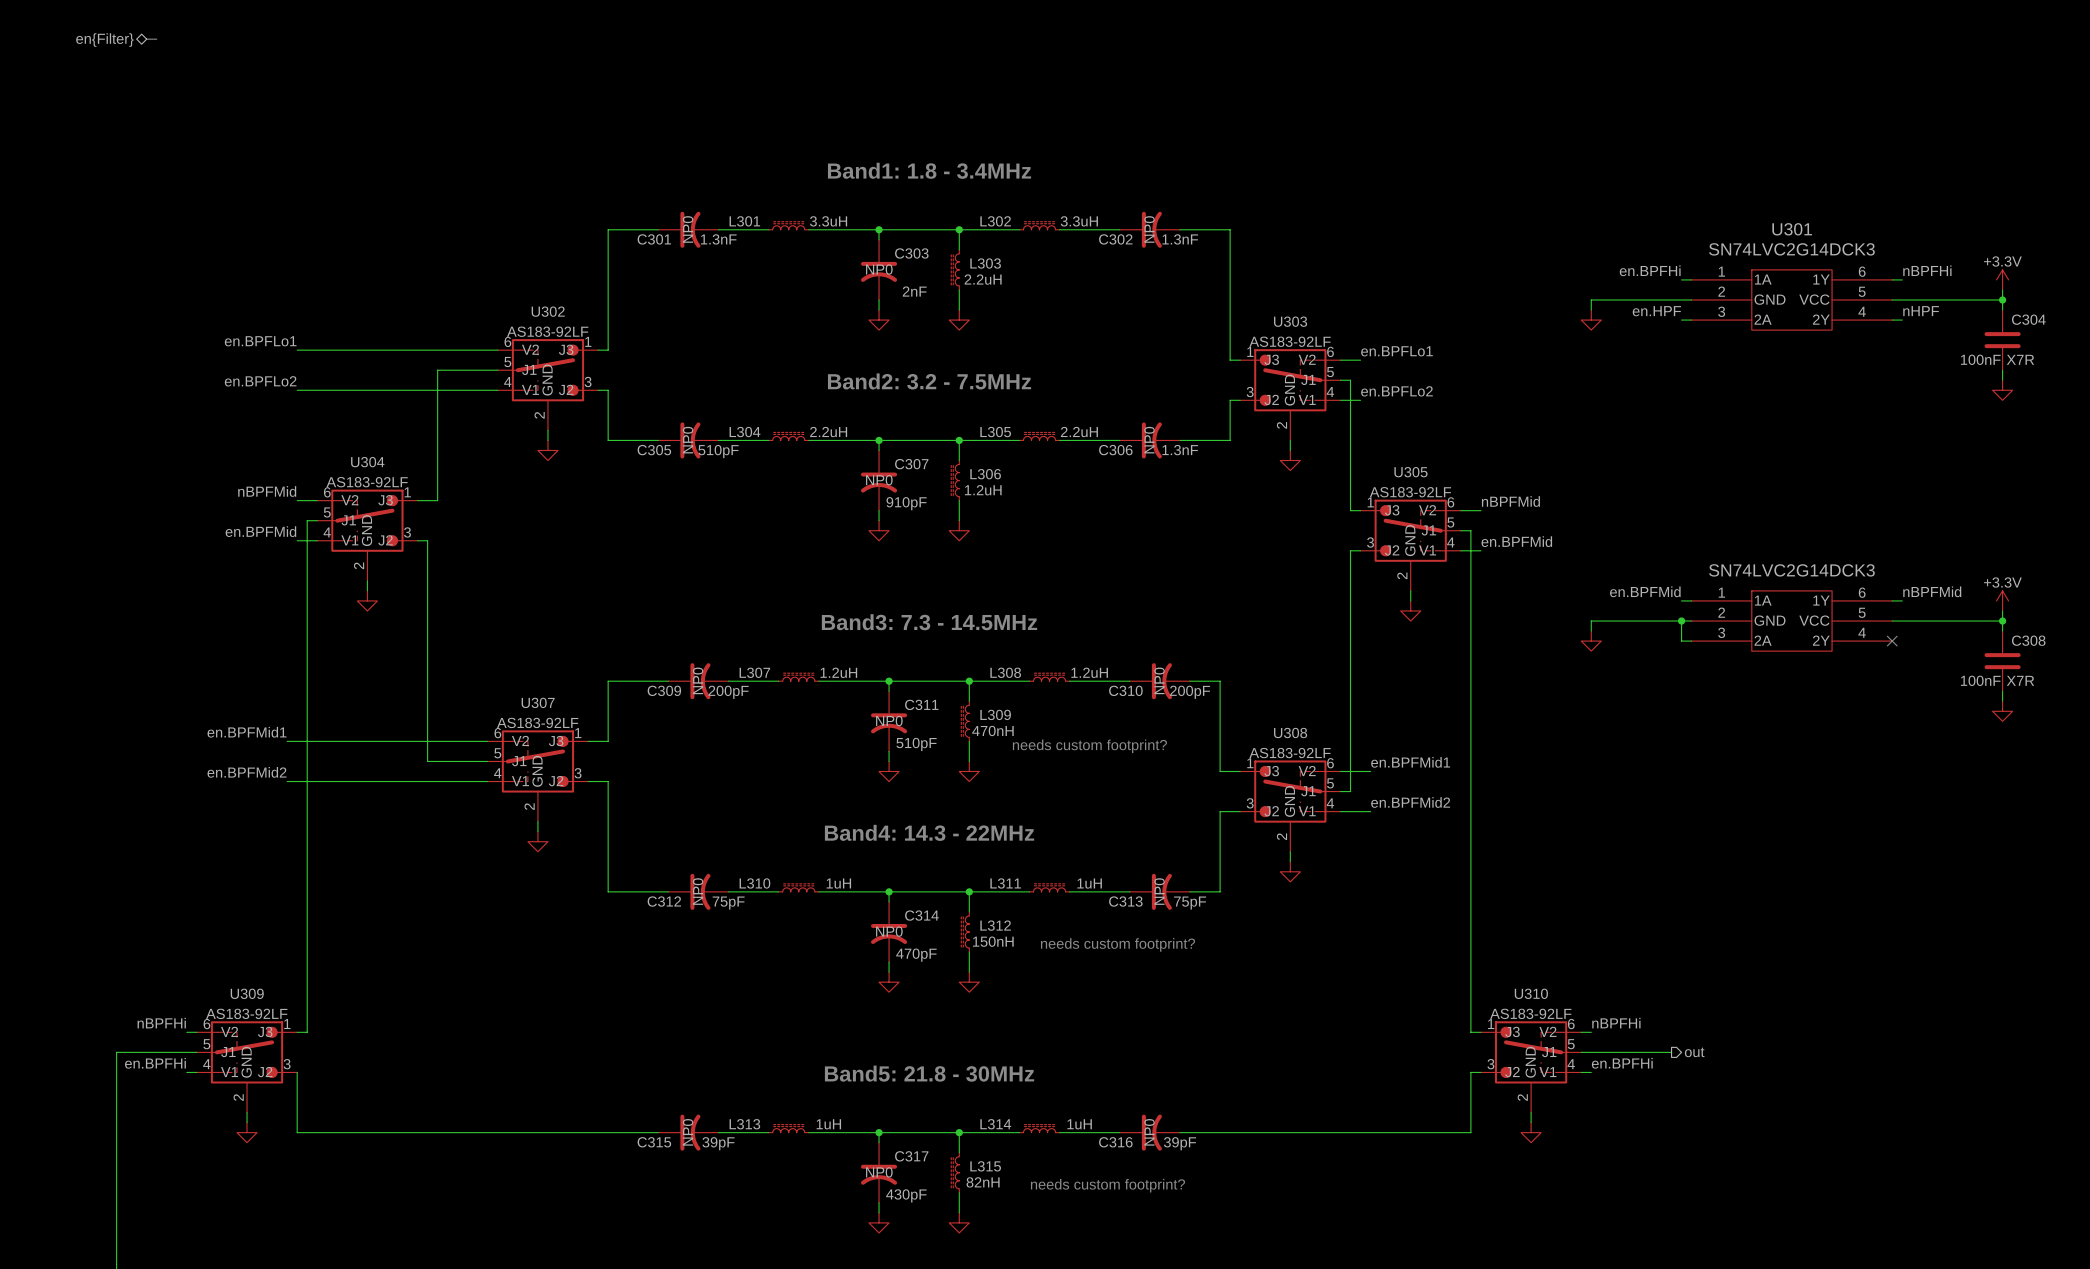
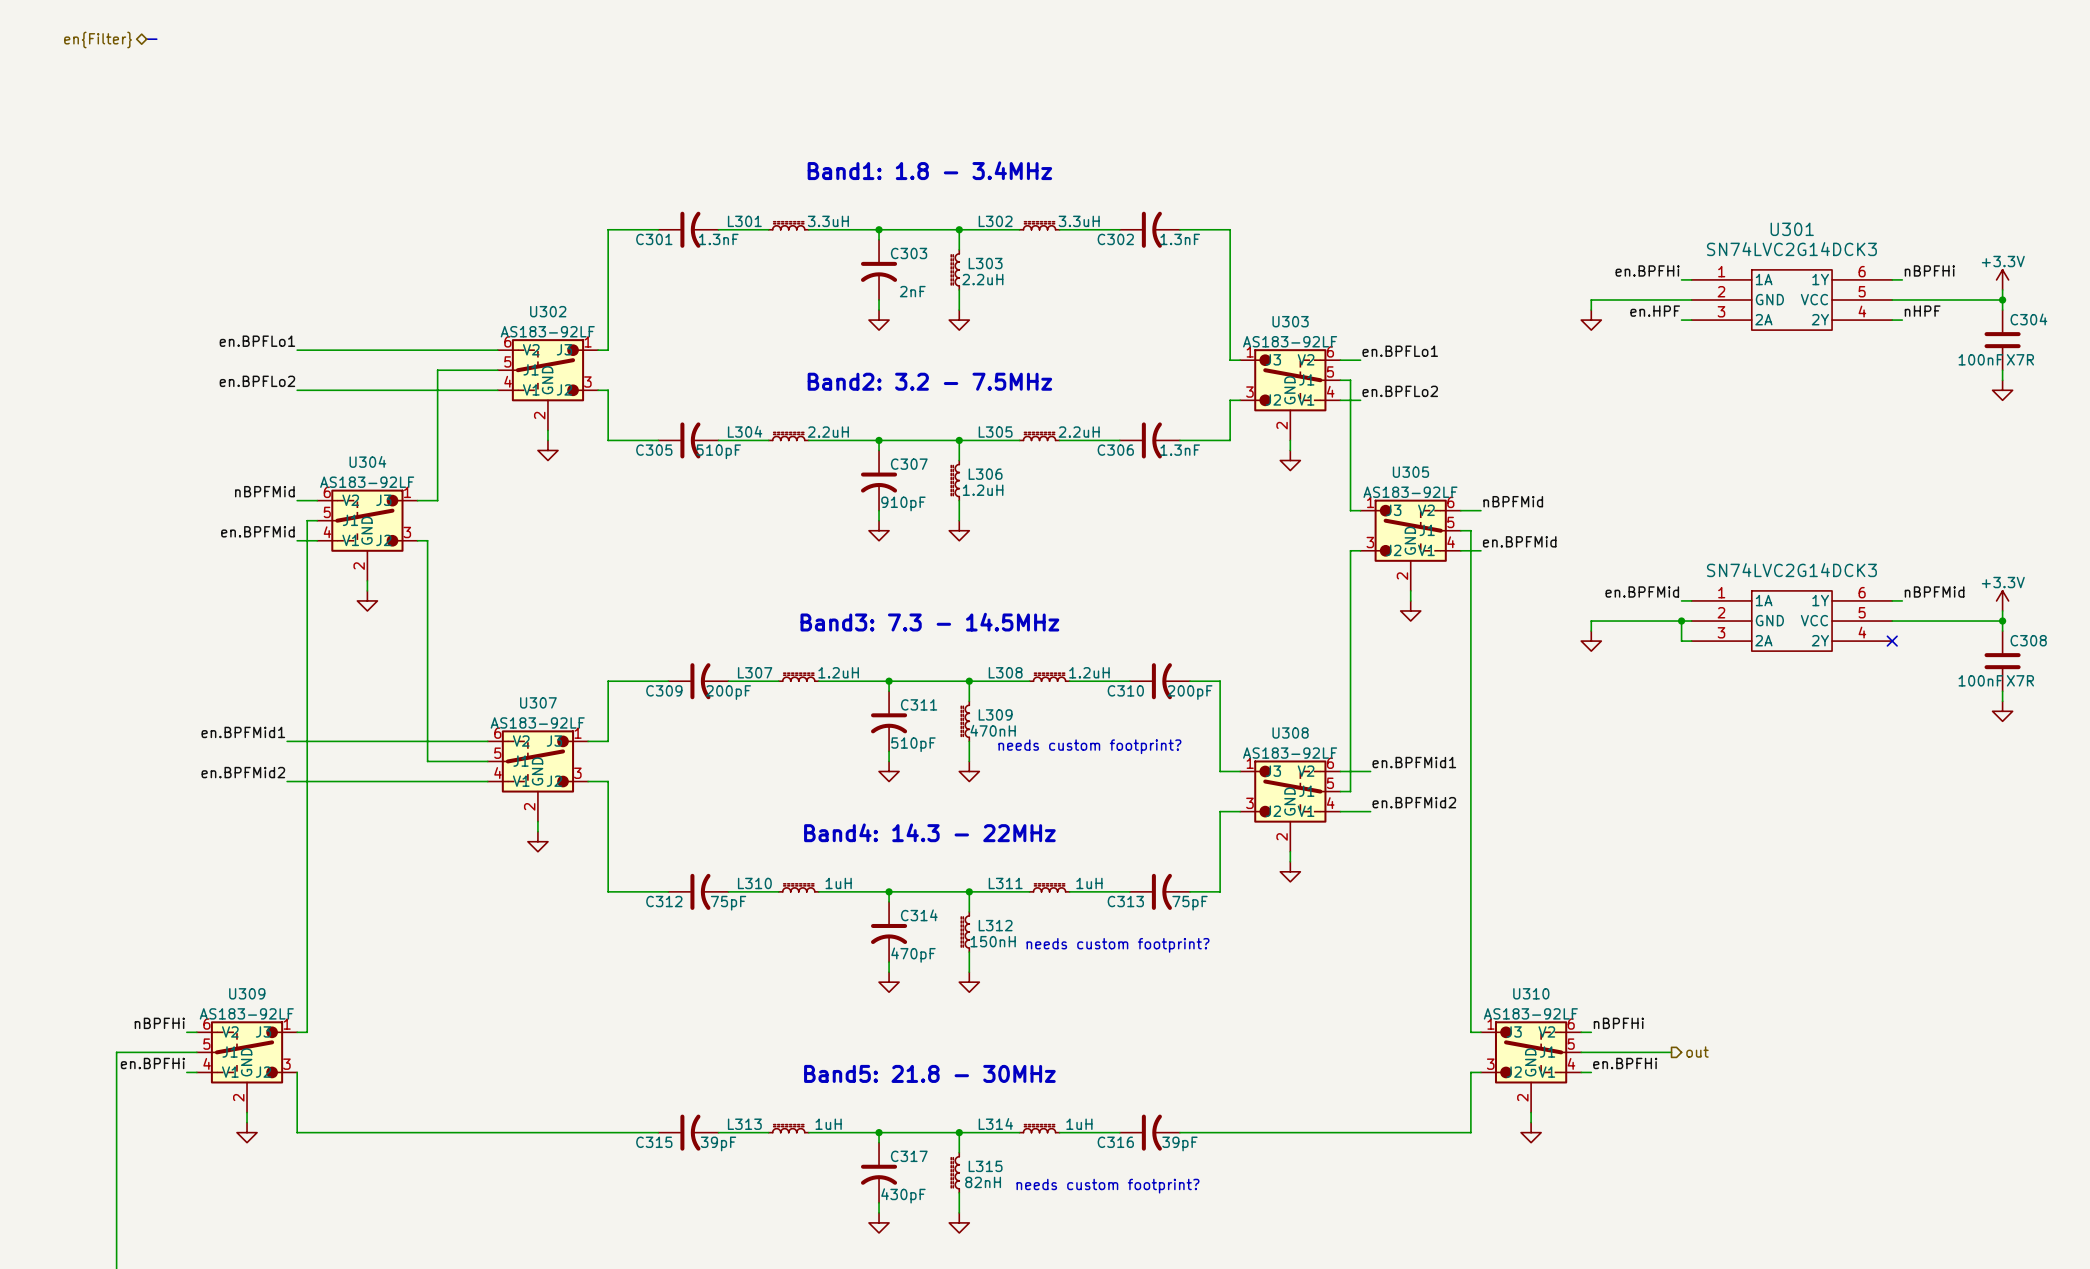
C301 text: NP0 (688, 229) -> none
C302 text: NP0 (1149, 229) -> none
C303 text: NP0 (879, 269) -> none
C305 text: NP0 (688, 440) -> none
C306 text: NP0 (1149, 440) -> none
C307 text: NP0 (879, 480) -> none
C309 text: NP0 (698, 680) -> none
C310 text: NP0 (1159, 680) -> none
C311 text: NP0 (889, 720) -> none
C312 text: NP0 (698, 891) -> none
C313 text: NP0 (1159, 891) -> none
C314 text: NP0 (889, 931) -> none
C315 text: NP0 (688, 1132) -> none
C316 text: NP0 (1149, 1132) -> none
C317 text: NP0 (879, 1172) -> none

